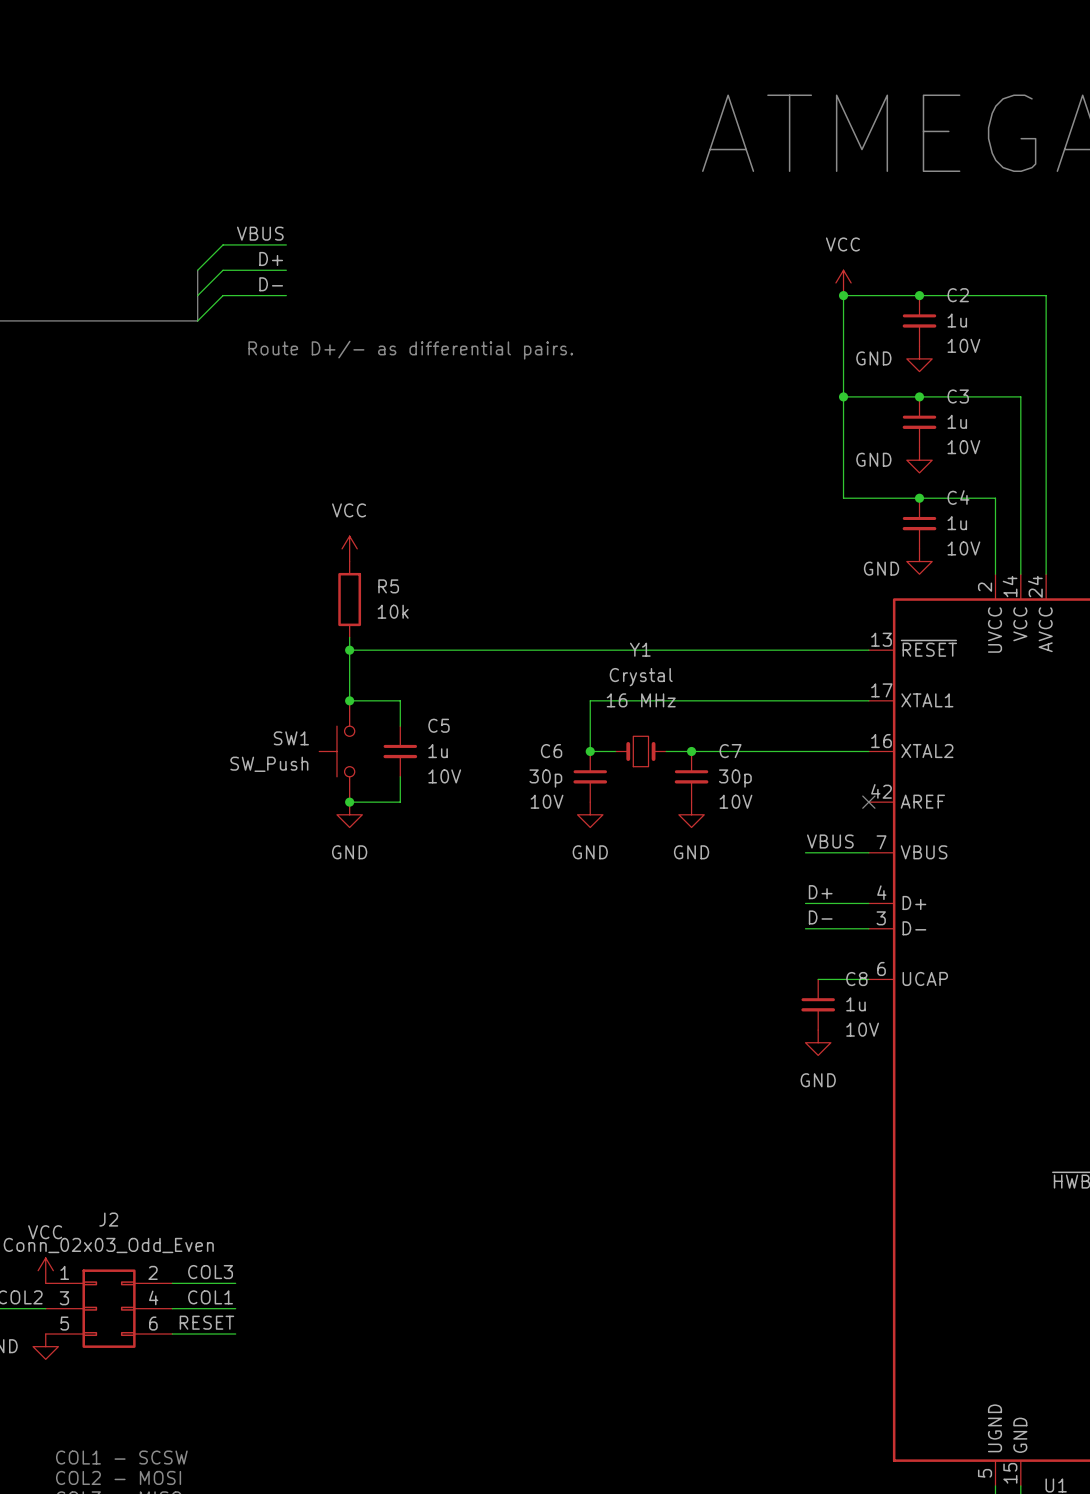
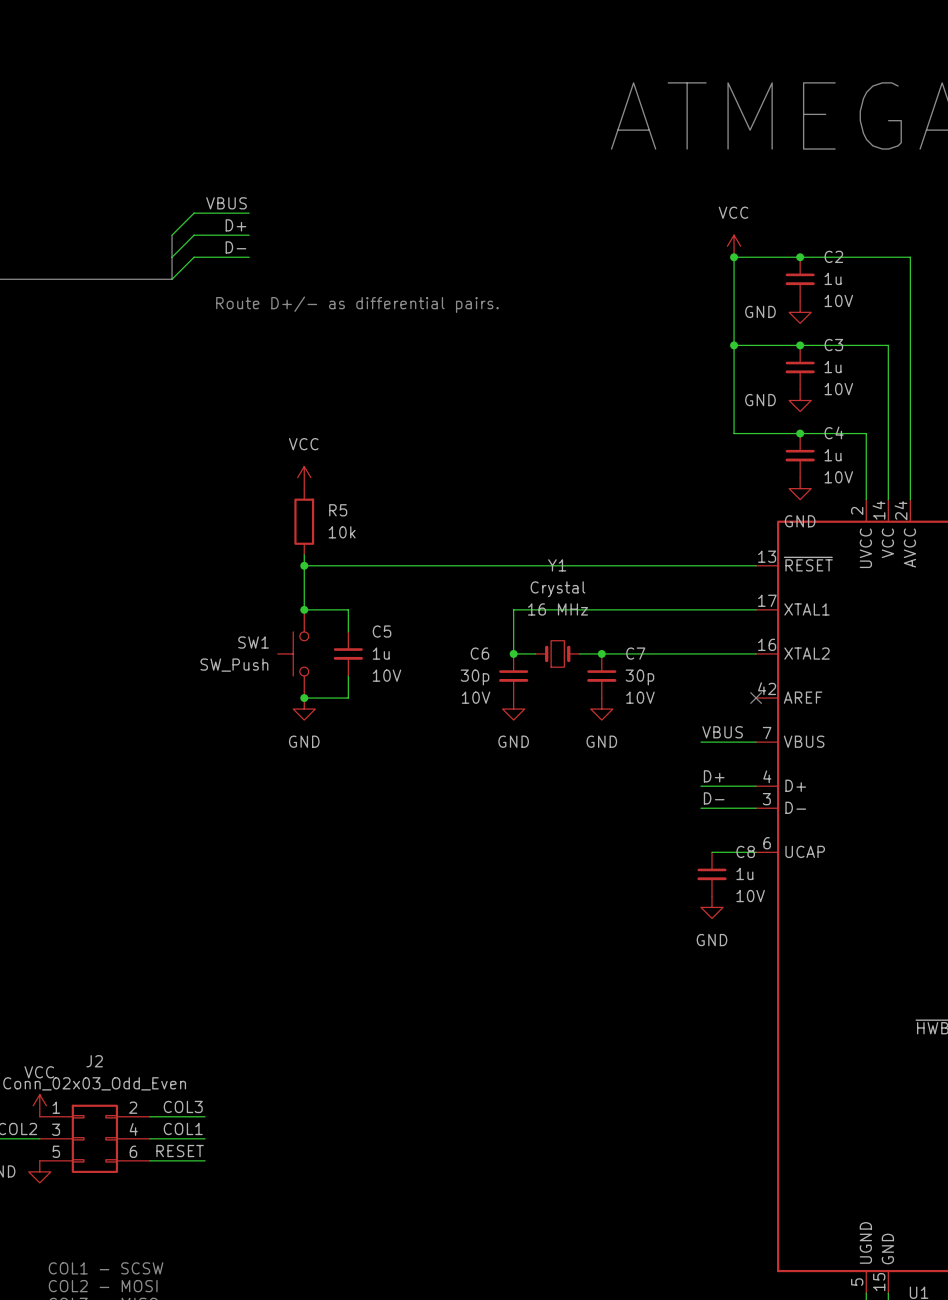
power symbol text position: GND (881, 568) -> GND (800, 521)

